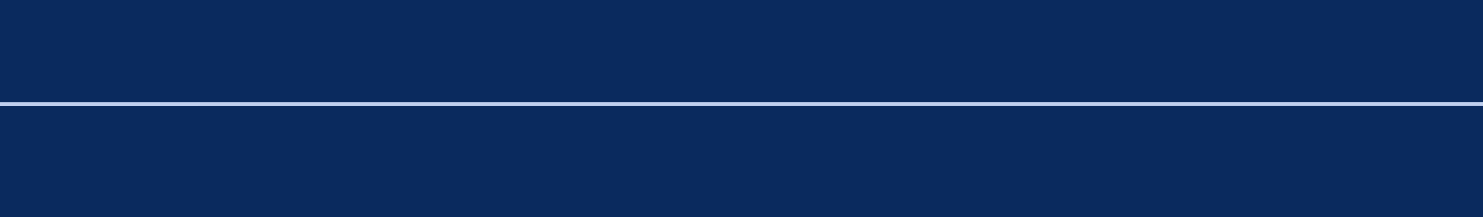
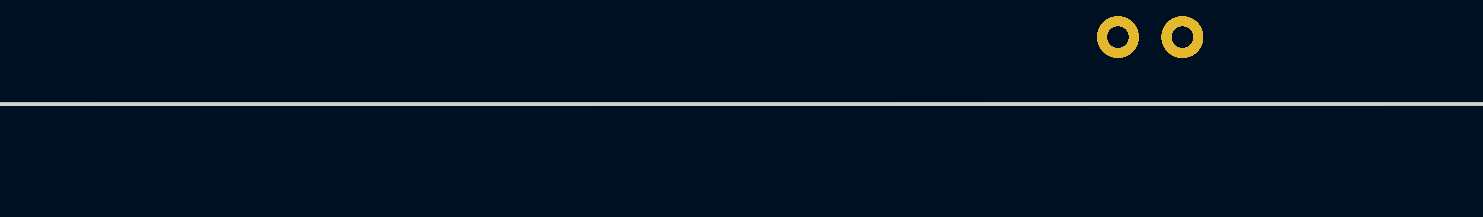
part: none -> (1150, 37)

